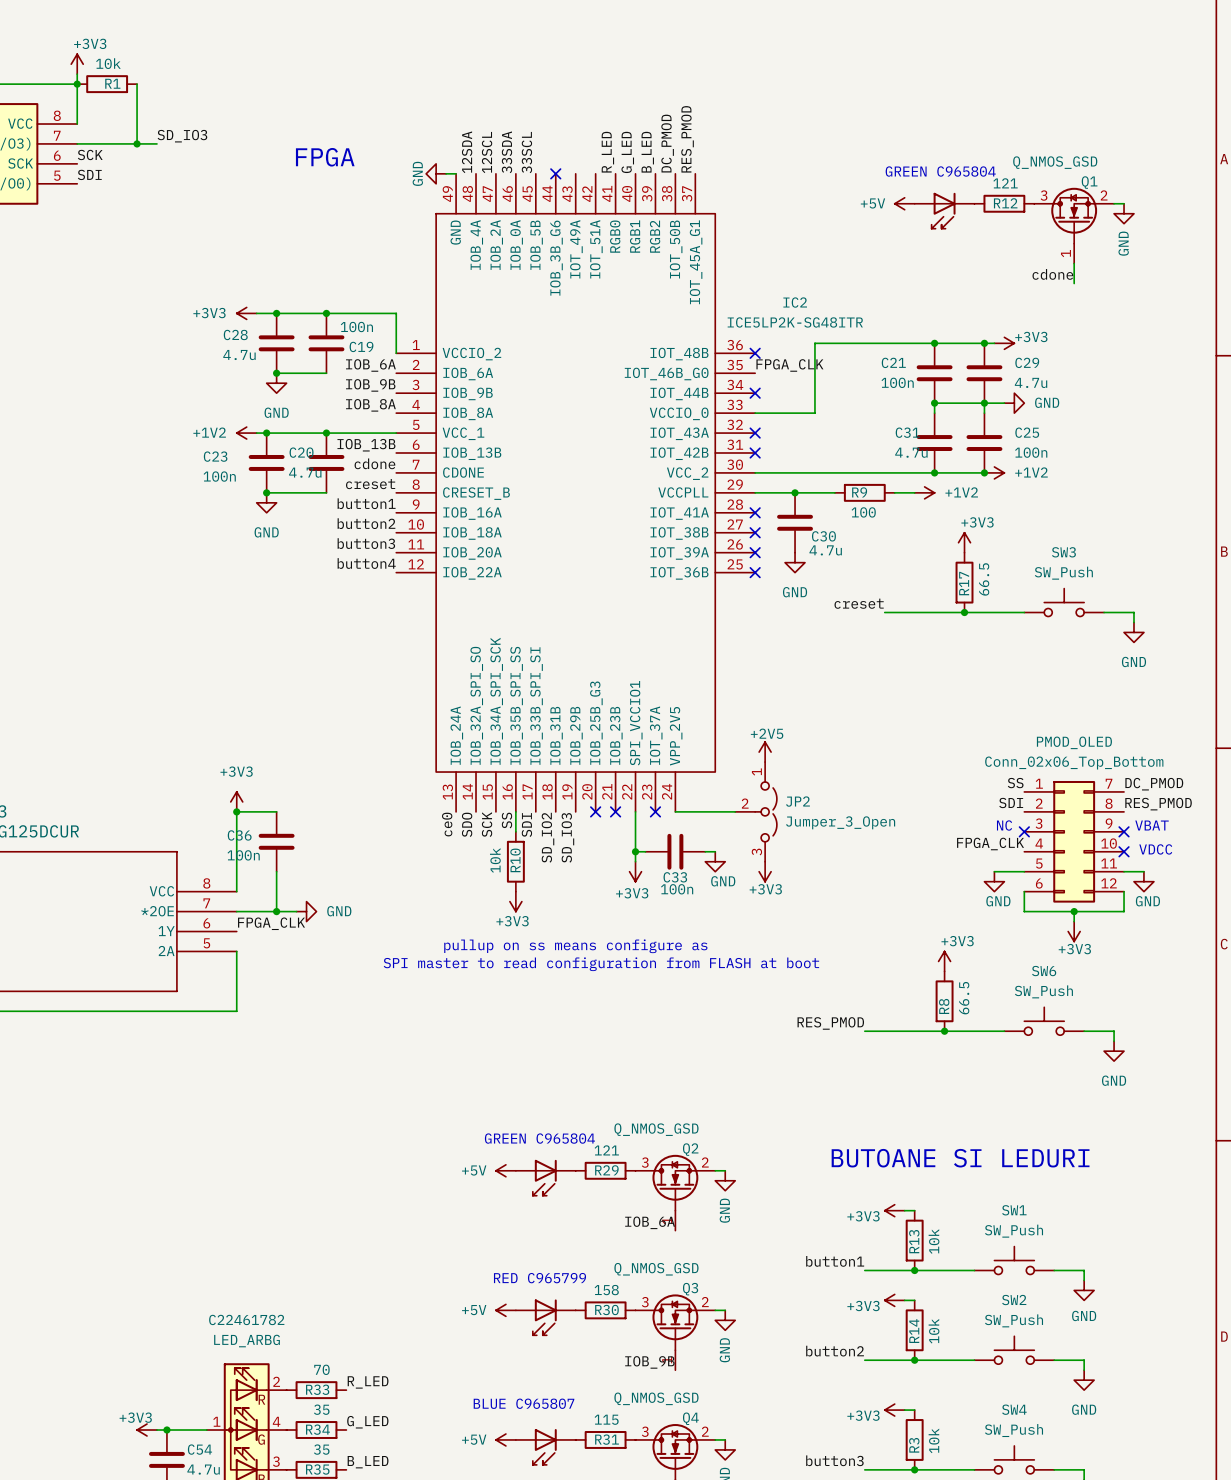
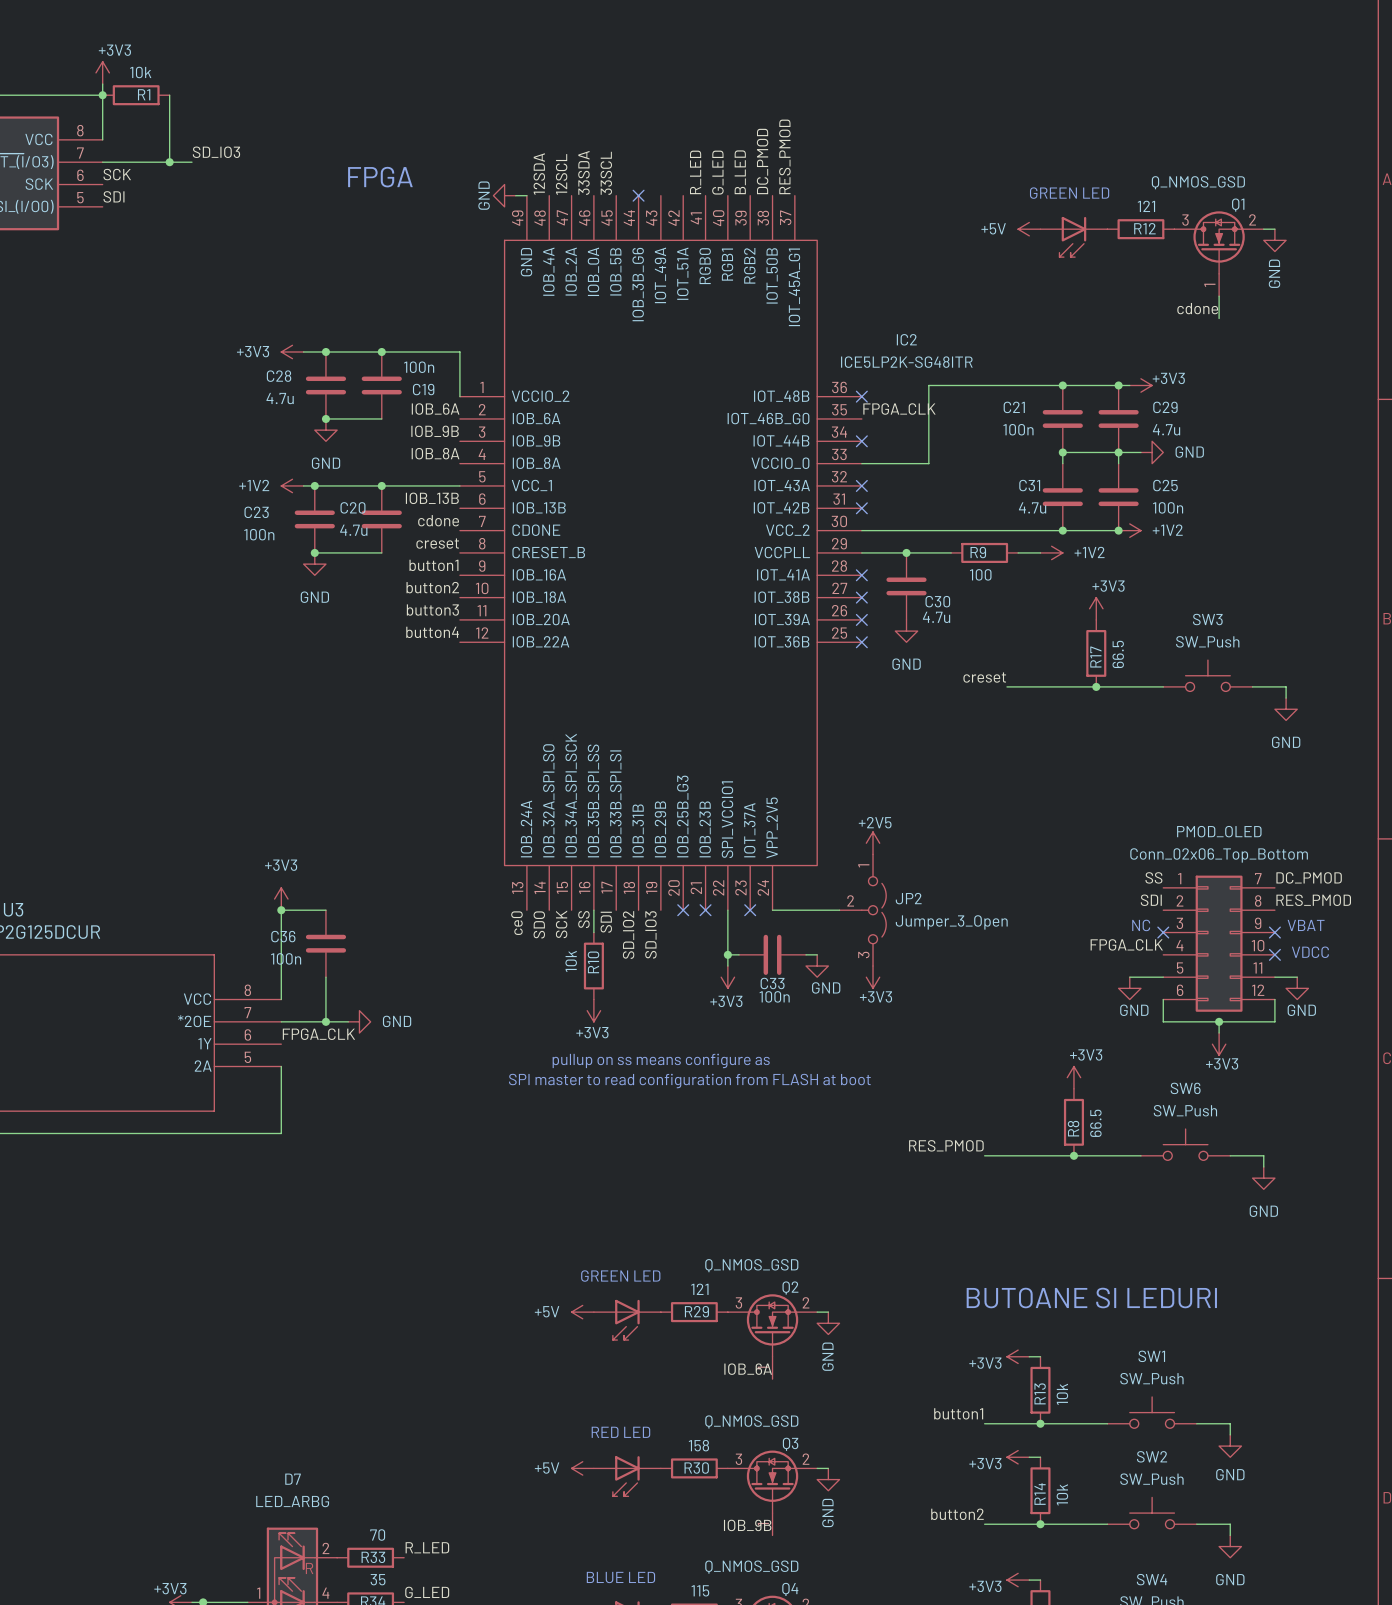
text: GREEN C965804 (940, 171) -> GREEN LED (1069, 193)
text: GREEN C965804 (539, 1138) -> GREEN LED (620, 1276)
text: RED C965799 (539, 1278) -> RED LED (620, 1432)
C22461782 name: C22461782 (246, 1319) -> D7 (293, 1479)
text: BLUE C965807 (523, 1403) -> none
text: none -> BLUE LED (620, 1577)

